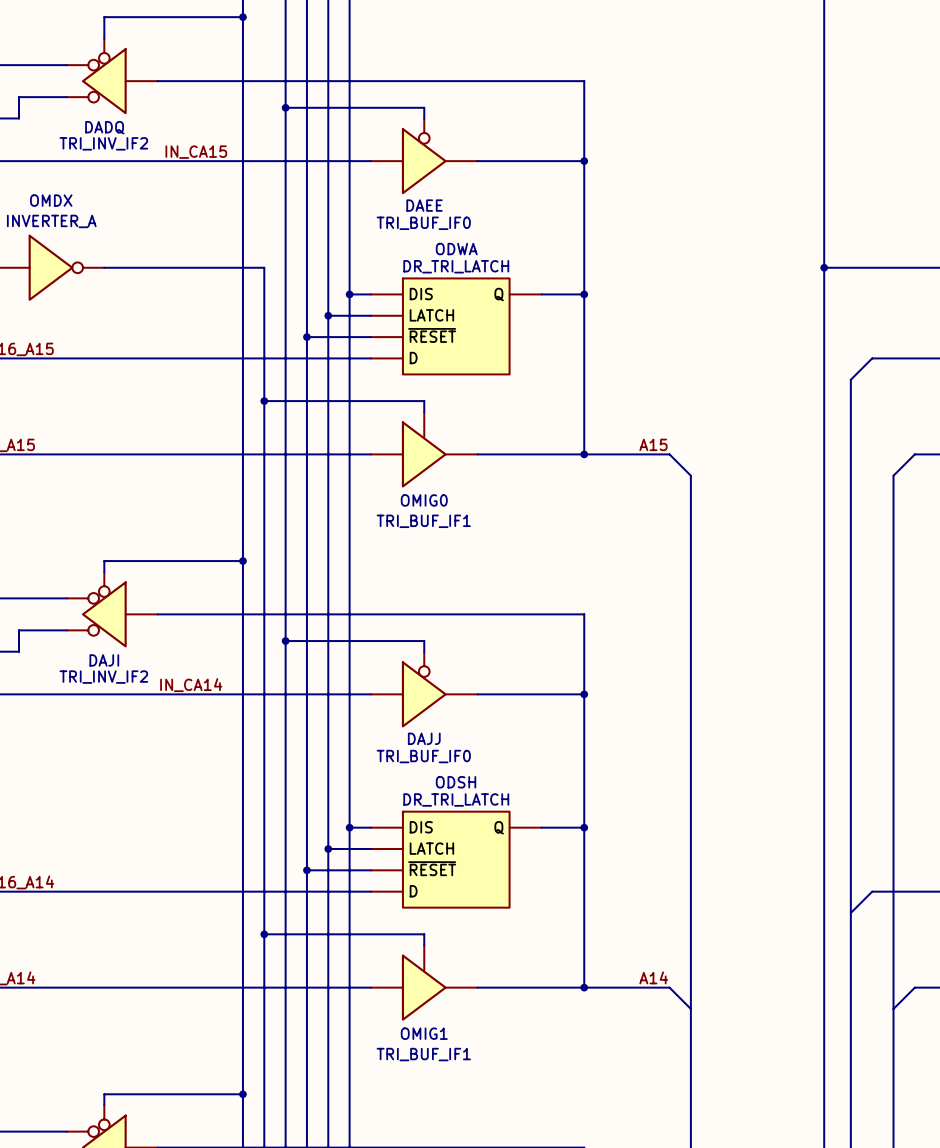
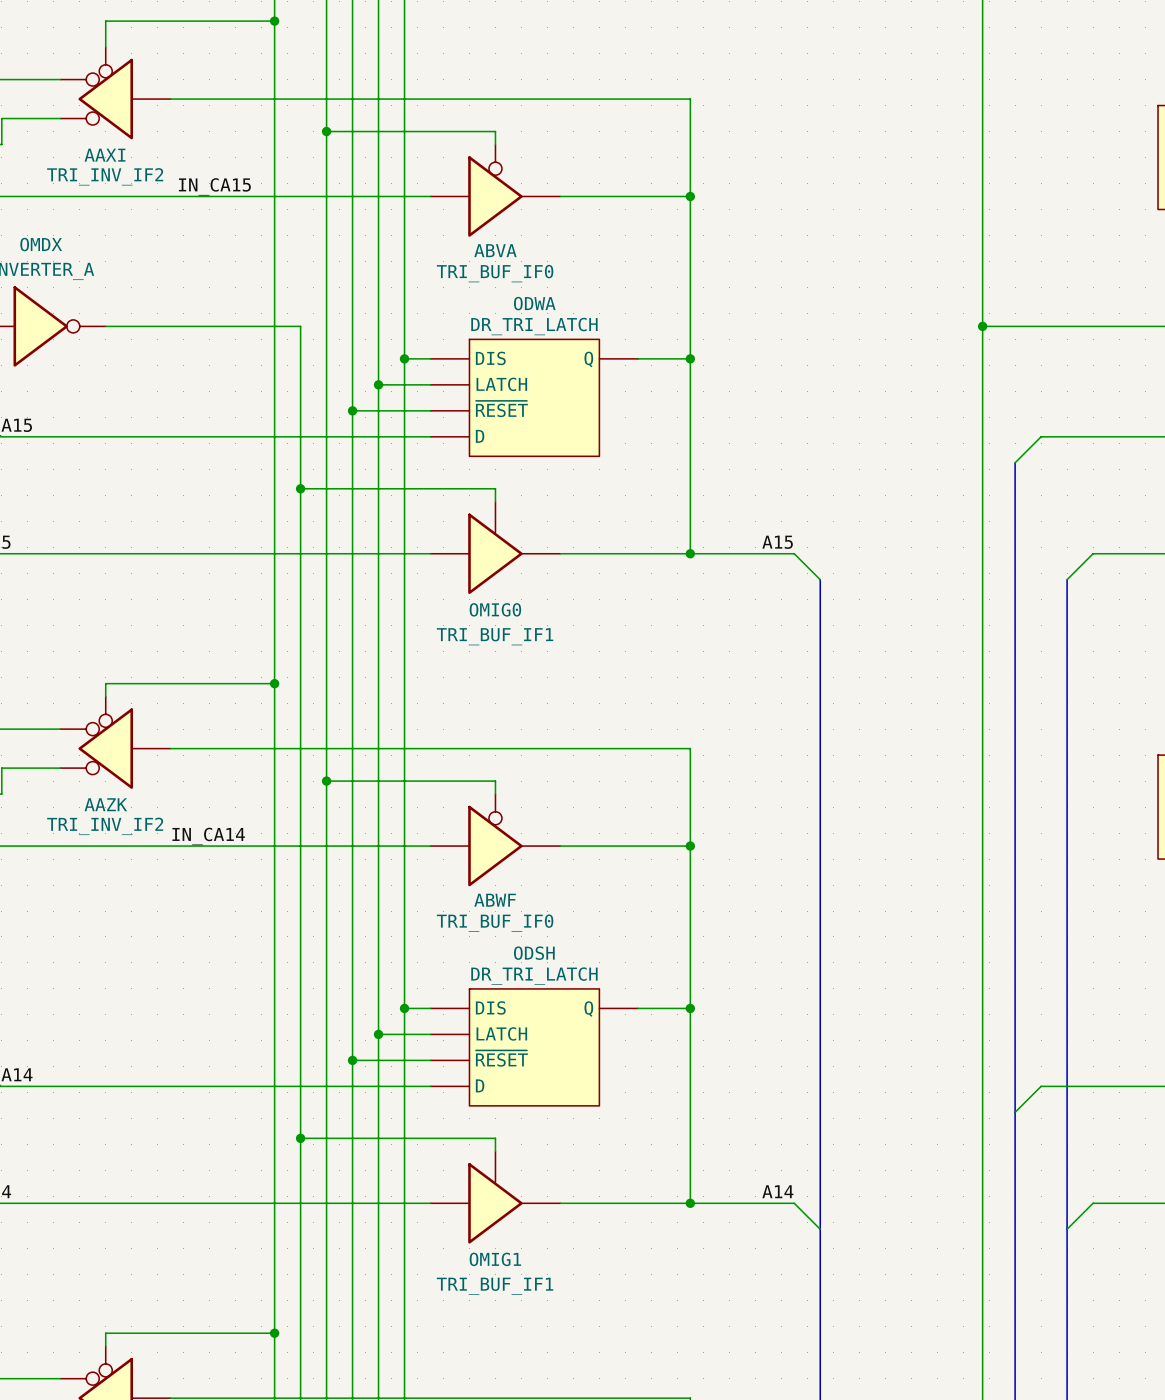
DADQ name: DADQ (104, 127) -> AAXI (105, 155)
DAEE name: DAEE (424, 205) -> ABVA (495, 250)
DAJI name: DAJI (104, 660) -> AAZK (105, 804)
DAJJ name: DAJJ (424, 738) -> ABWF (495, 900)

